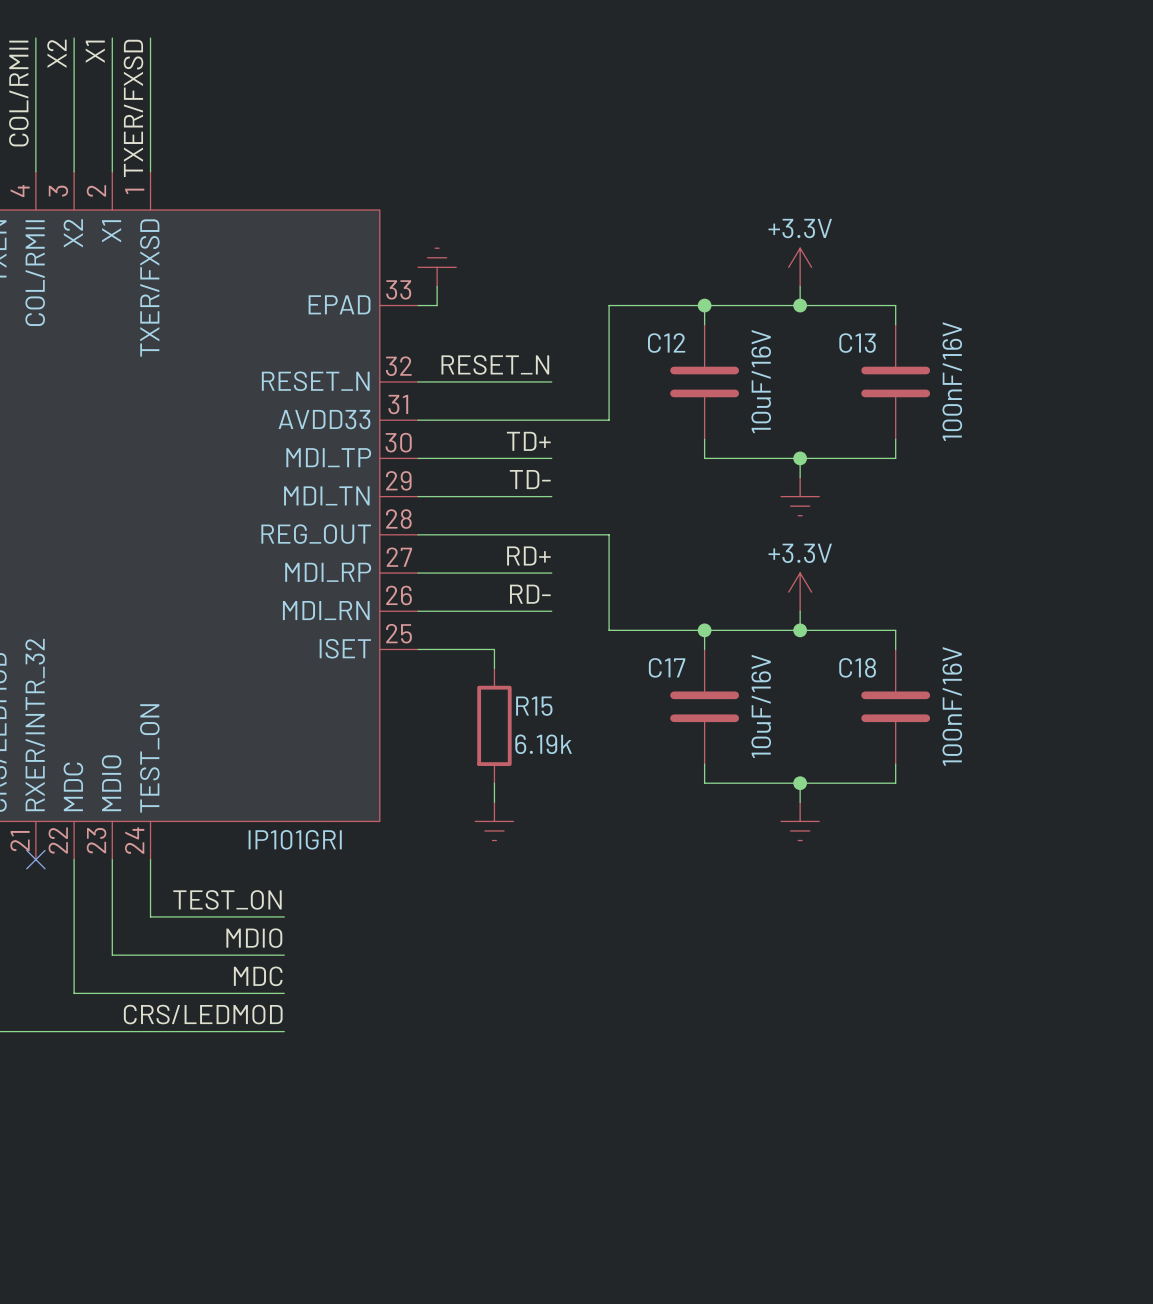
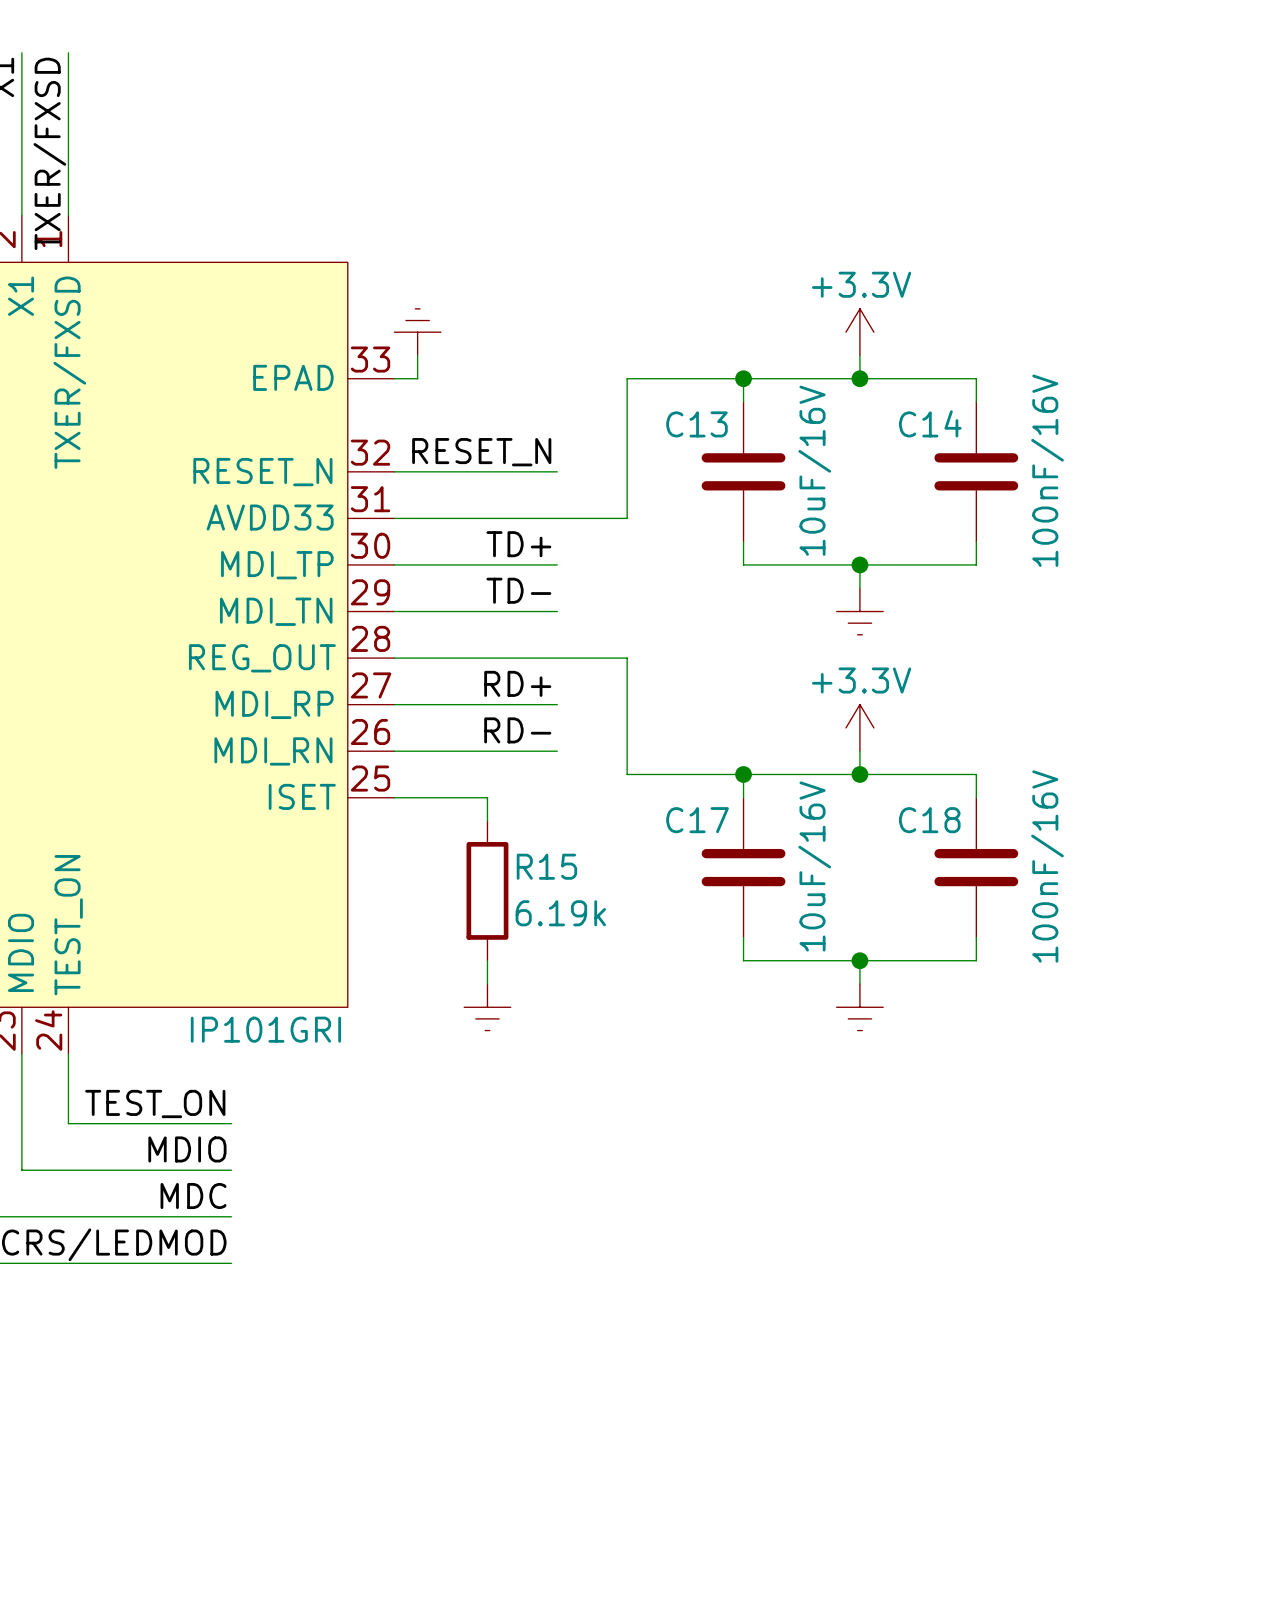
C12 name: C12 (666, 343) -> C13 (696, 424)
C13 name: C13 (857, 343) -> C14 (930, 423)

